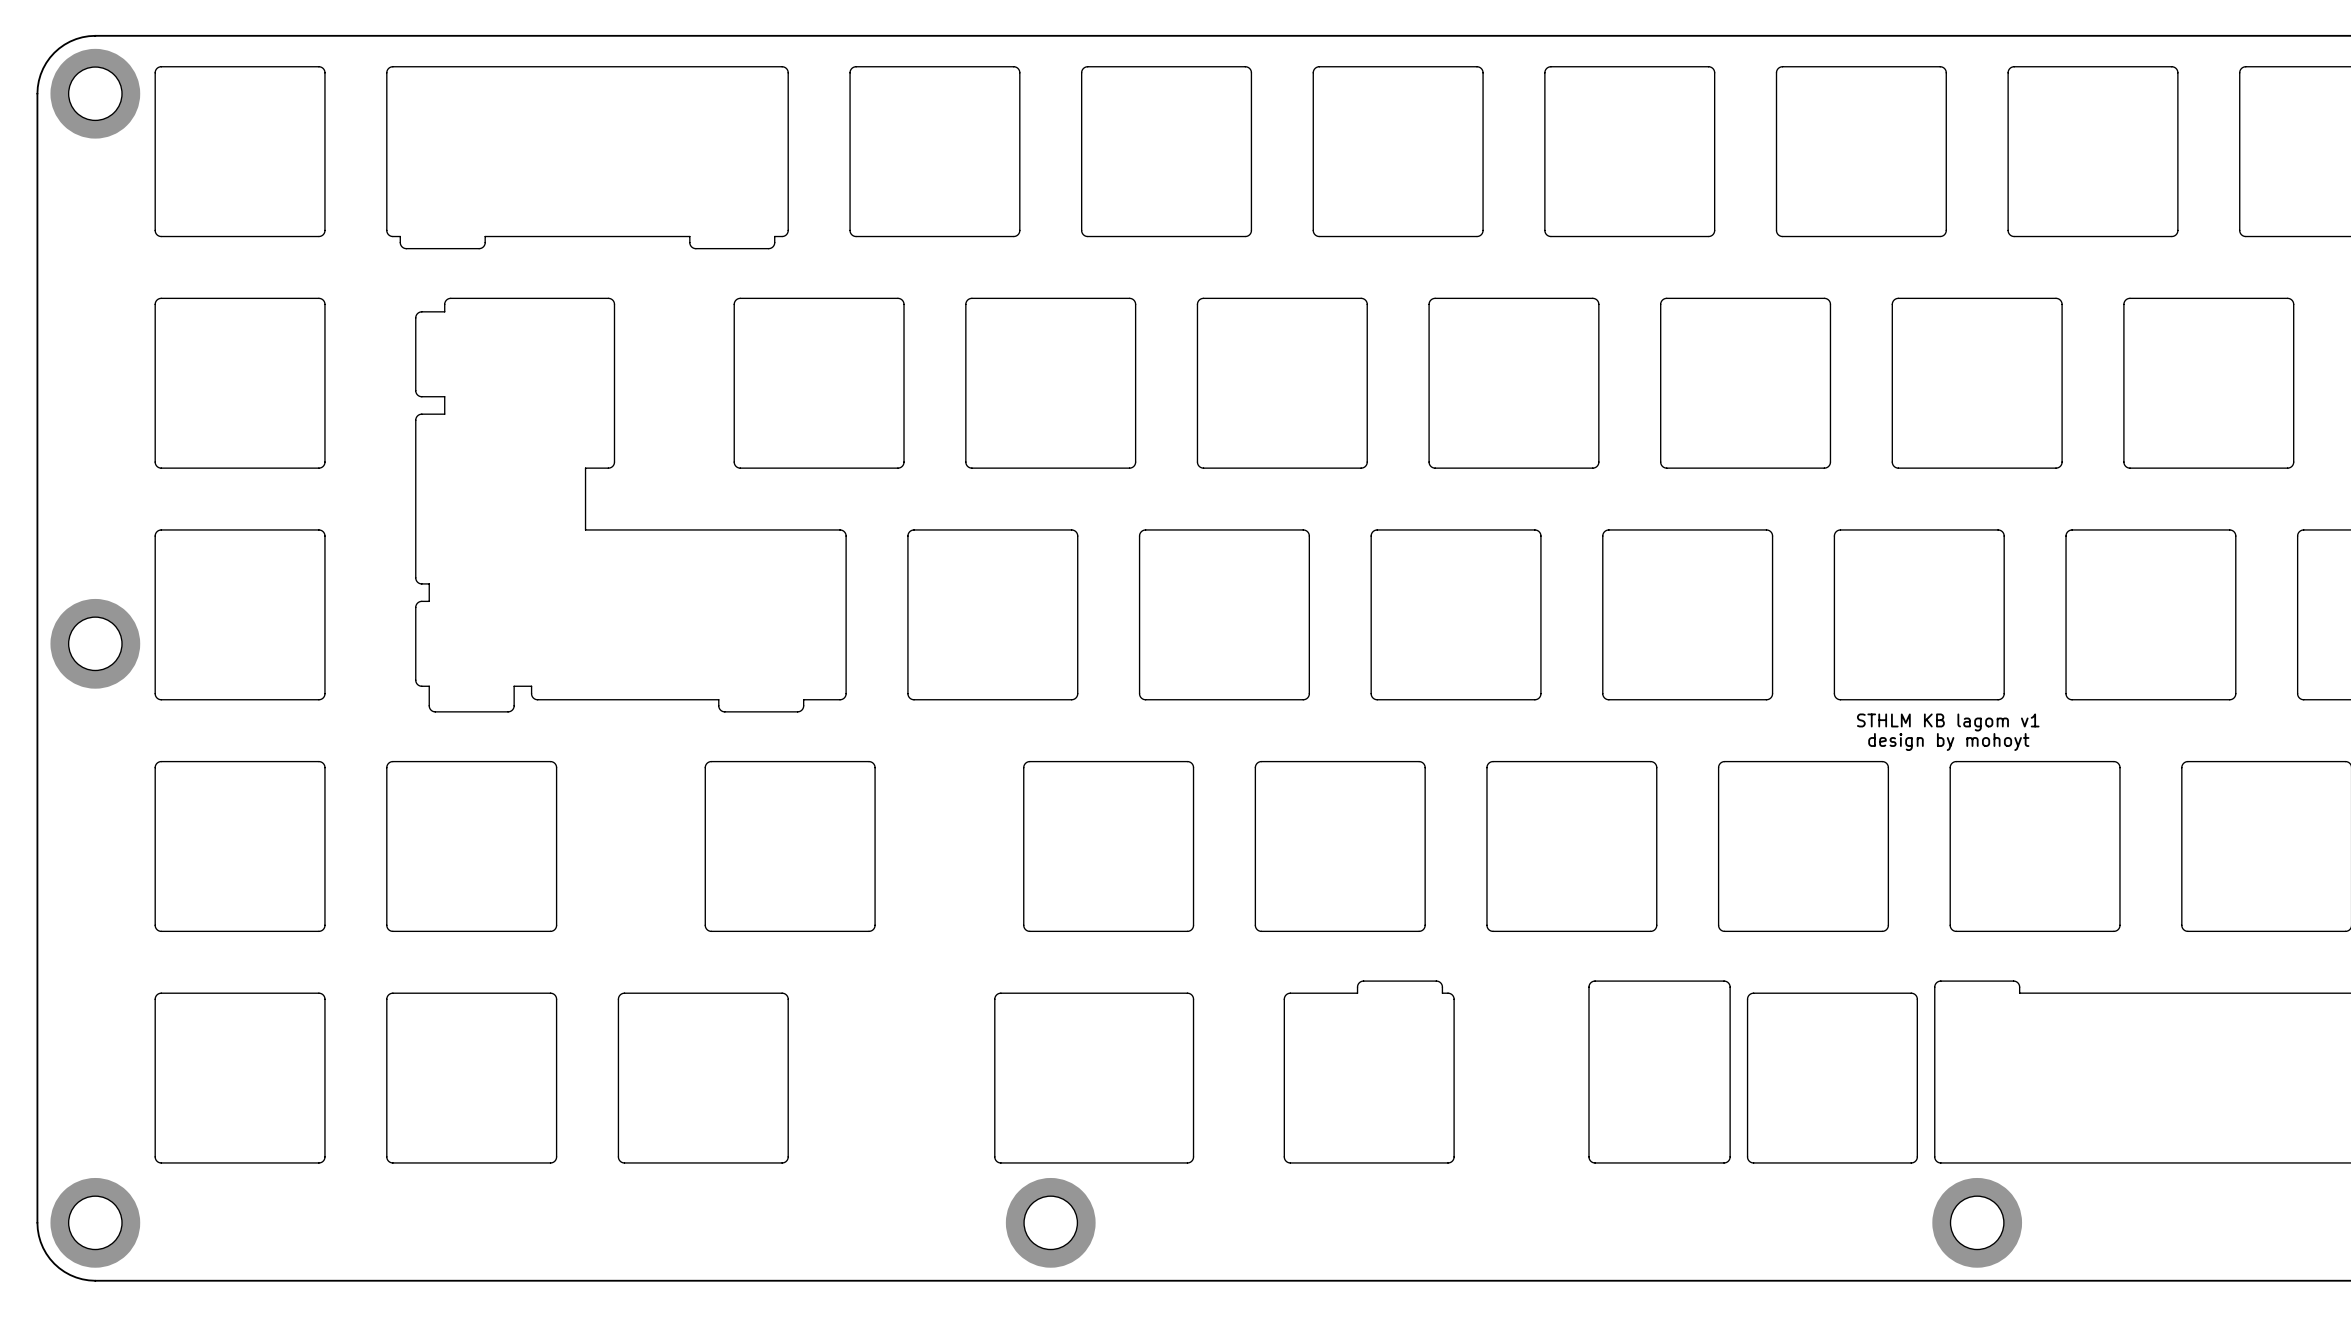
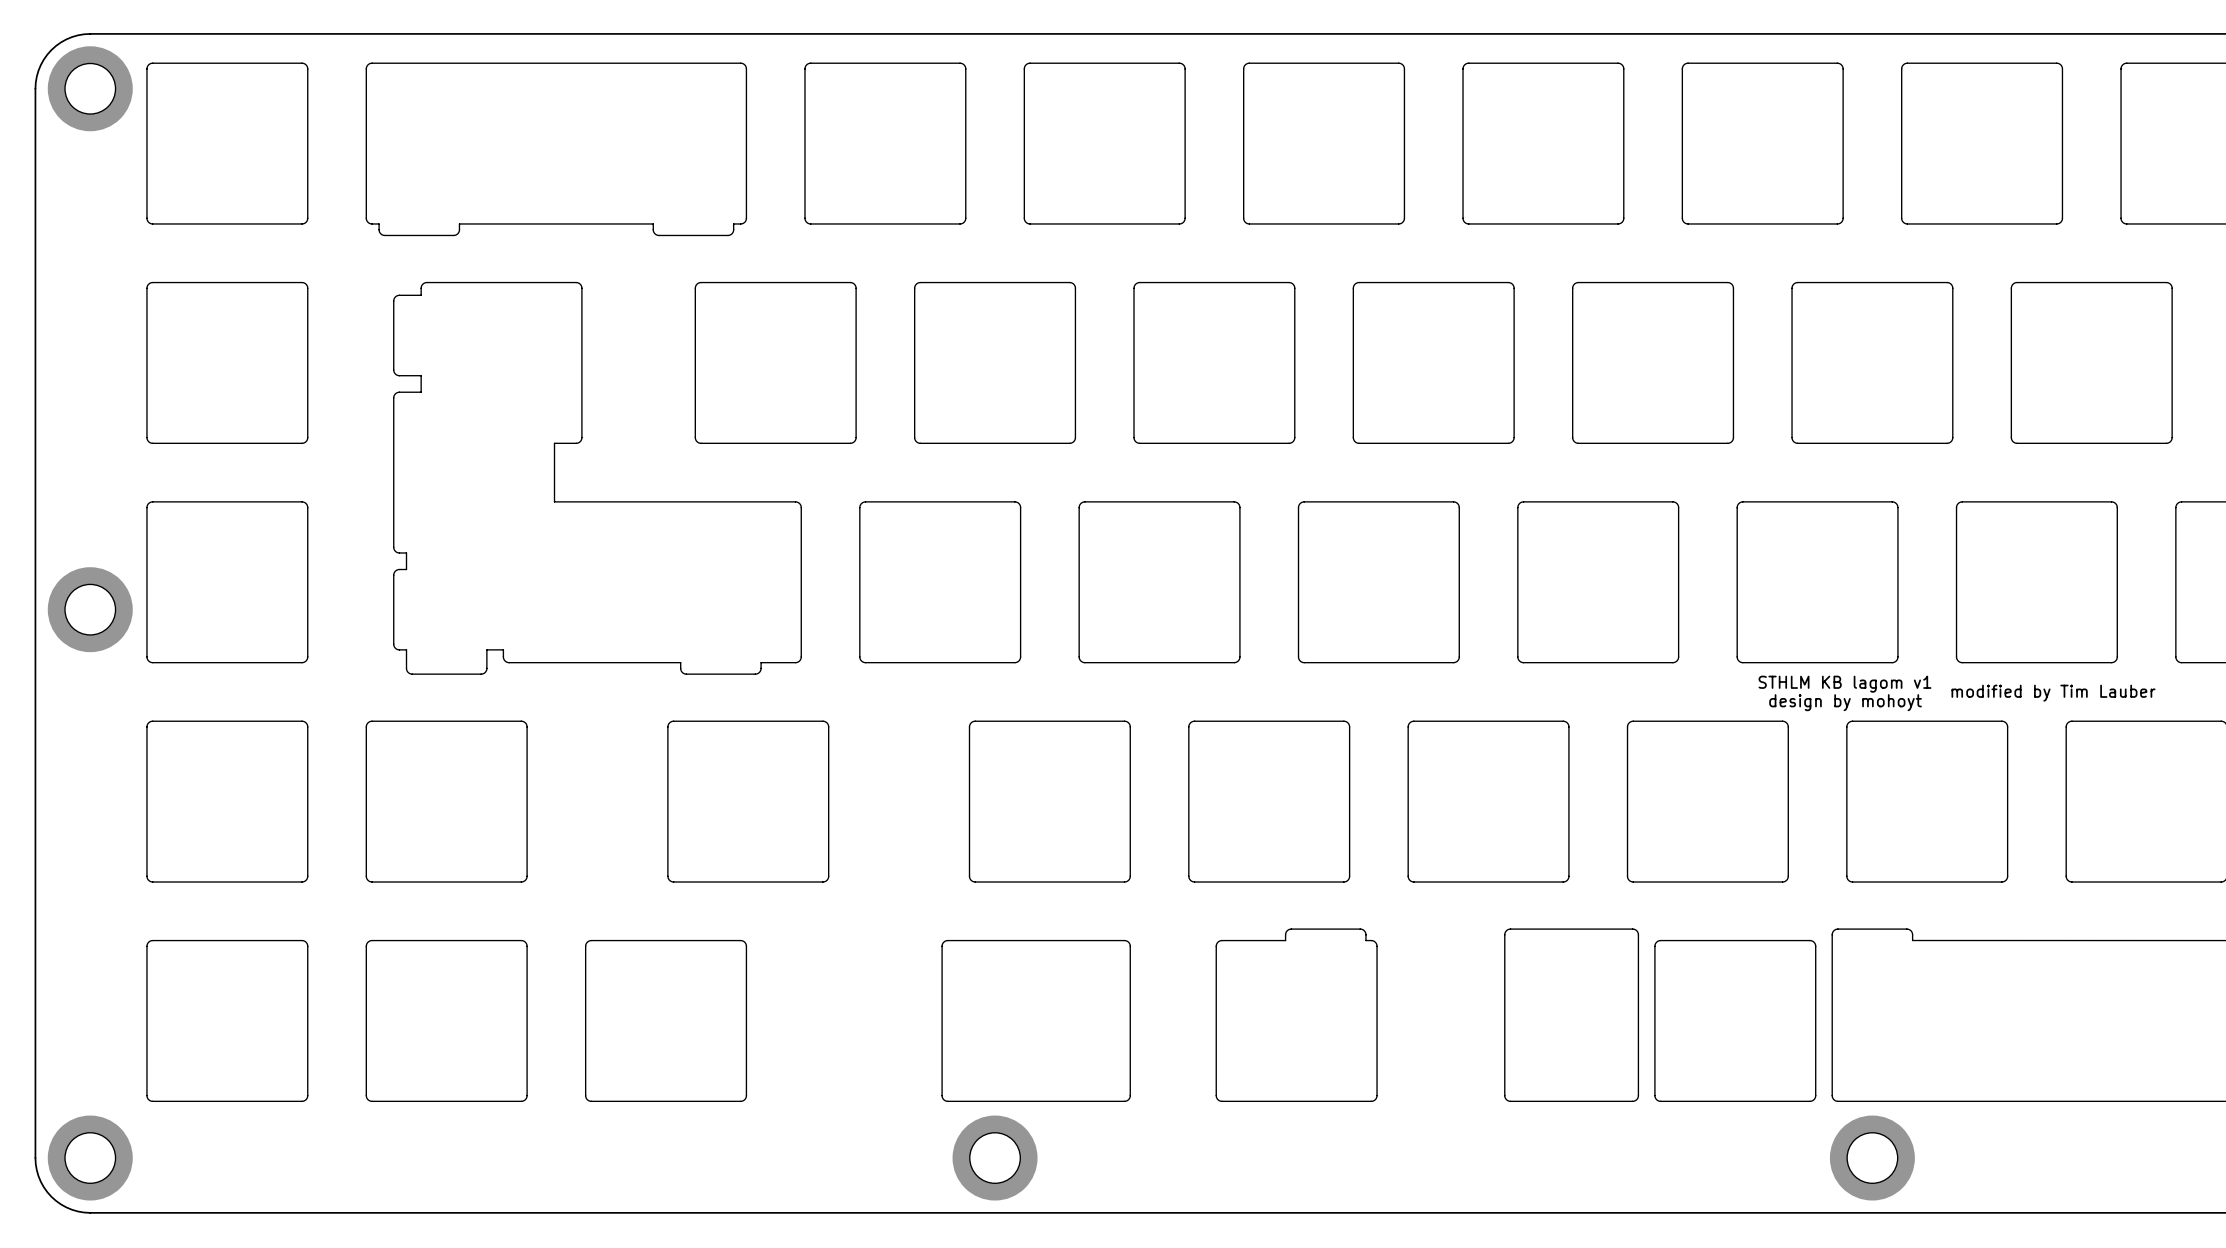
text: none -> modified by Tim Lauber (2053, 693)

